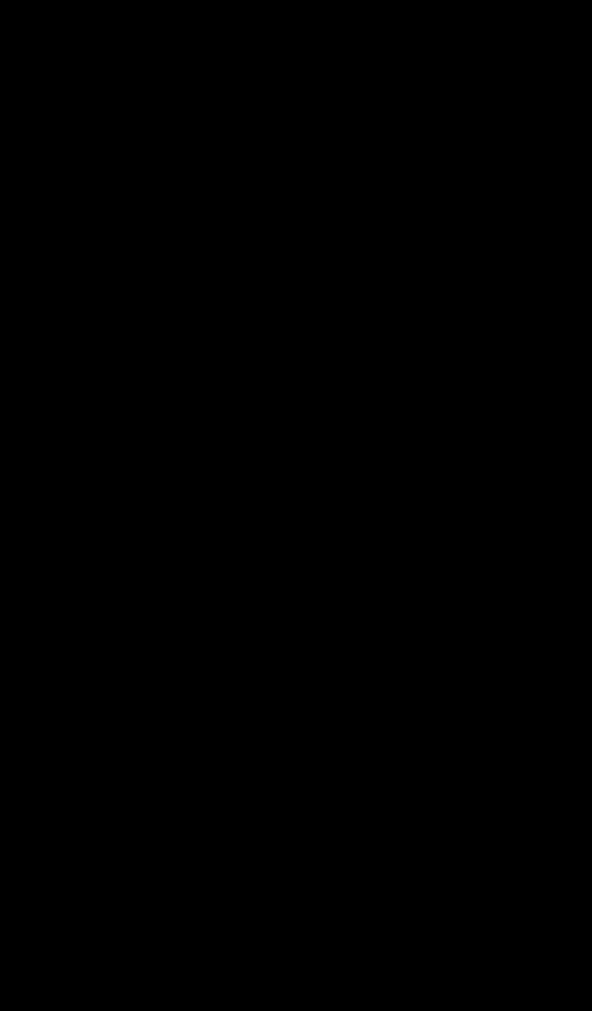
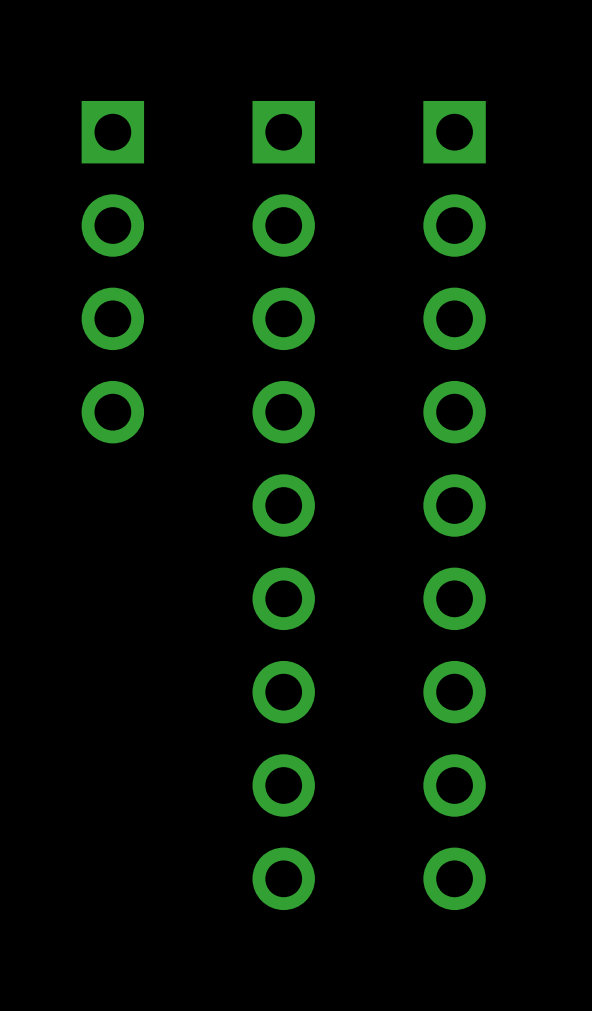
part: none -> (112, 272)
part: none -> (283, 505)
part: none -> (454, 505)

